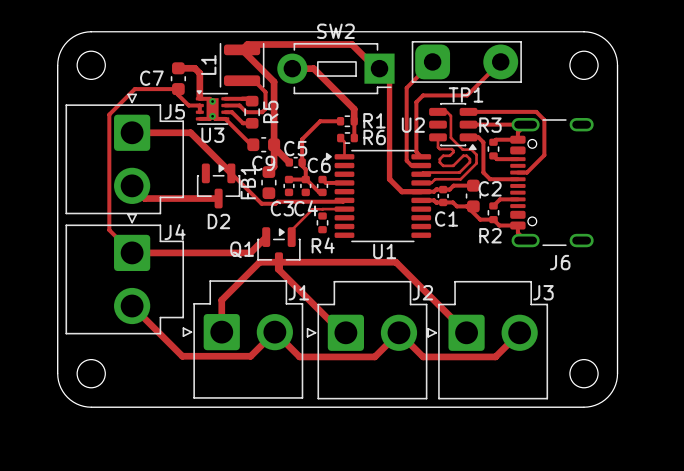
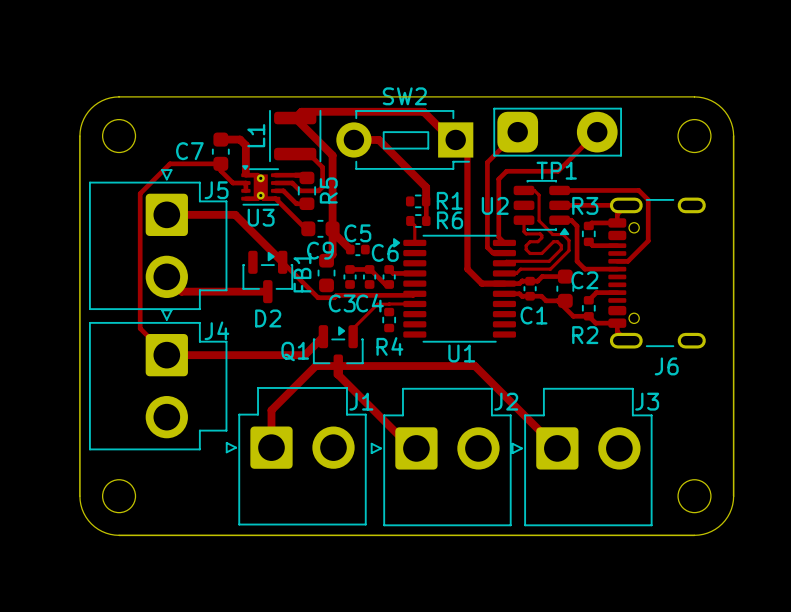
track: (340, 121) (320, 121) (302, 139) (302, 165) (305, 169) (305, 179) -> none
track: (132, 306) (182, 356) (250, 356) (274, 332) (299, 356) (374, 356) (398, 332) (423, 356) (495, 356) (519, 332) -> none

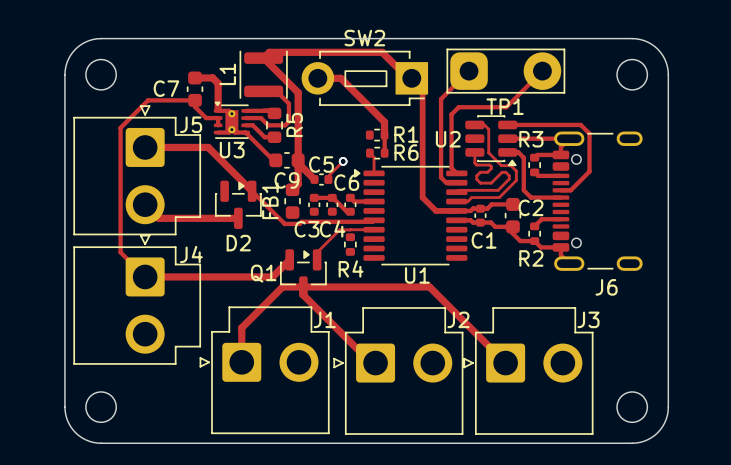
track: none -> (343, 161) (328, 176) (328, 179)
via: none -> (343, 161)

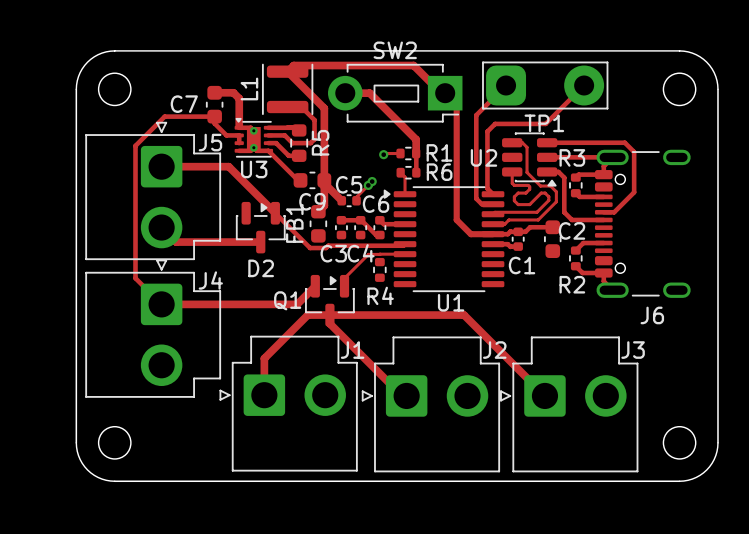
track: none -> (400, 153) (383, 154)
via: none -> (383, 154)
via: none -> (368, 185)
track: (480, 222) (491, 222) (495, 226) (506, 226) (520, 241) (534, 241) -> none

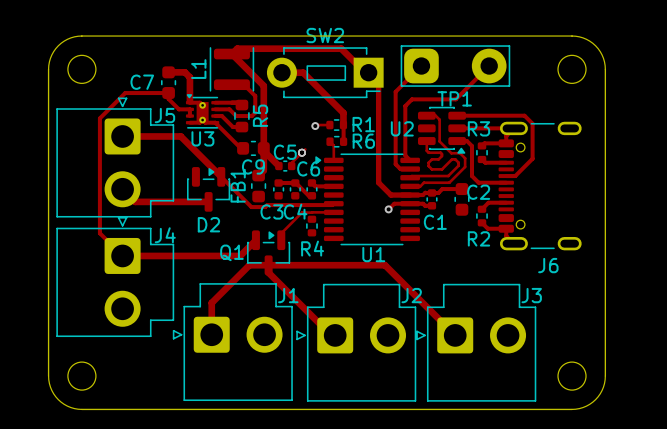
via: (372, 181) -> none
track: none -> (410, 203) (394, 203) (388, 209)
via: none -> (388, 209)

